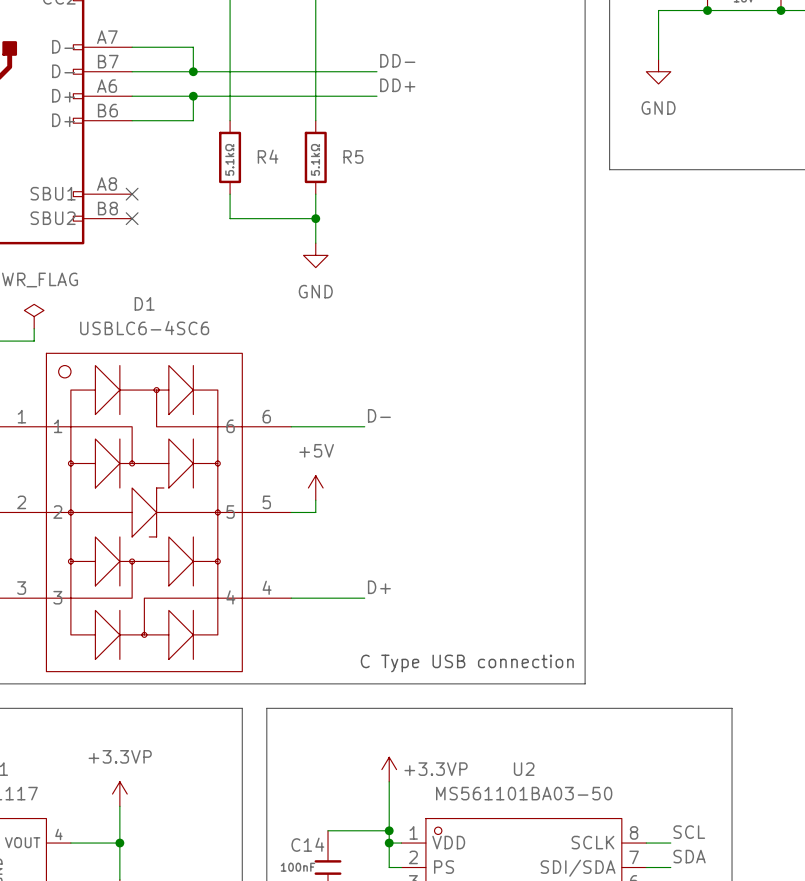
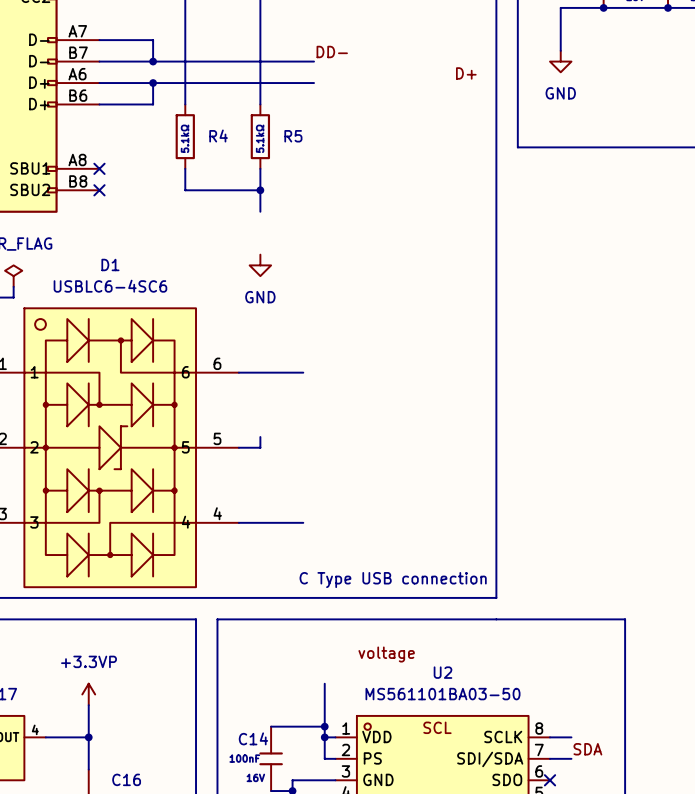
label: DD+ (397, 85) -> none
label: none -> D+ (466, 73)
power symbol position: GND (315, 255) -> GND (260, 265)
label: D- (379, 415) -> none
power symbol: +5V (315, 487) -> none
label: D+ (379, 587) -> none
label: none -> voltage (386, 654)
power symbol: +3.3VP (389, 769) -> none
label position: SCL (689, 832) -> SCL (437, 727)

